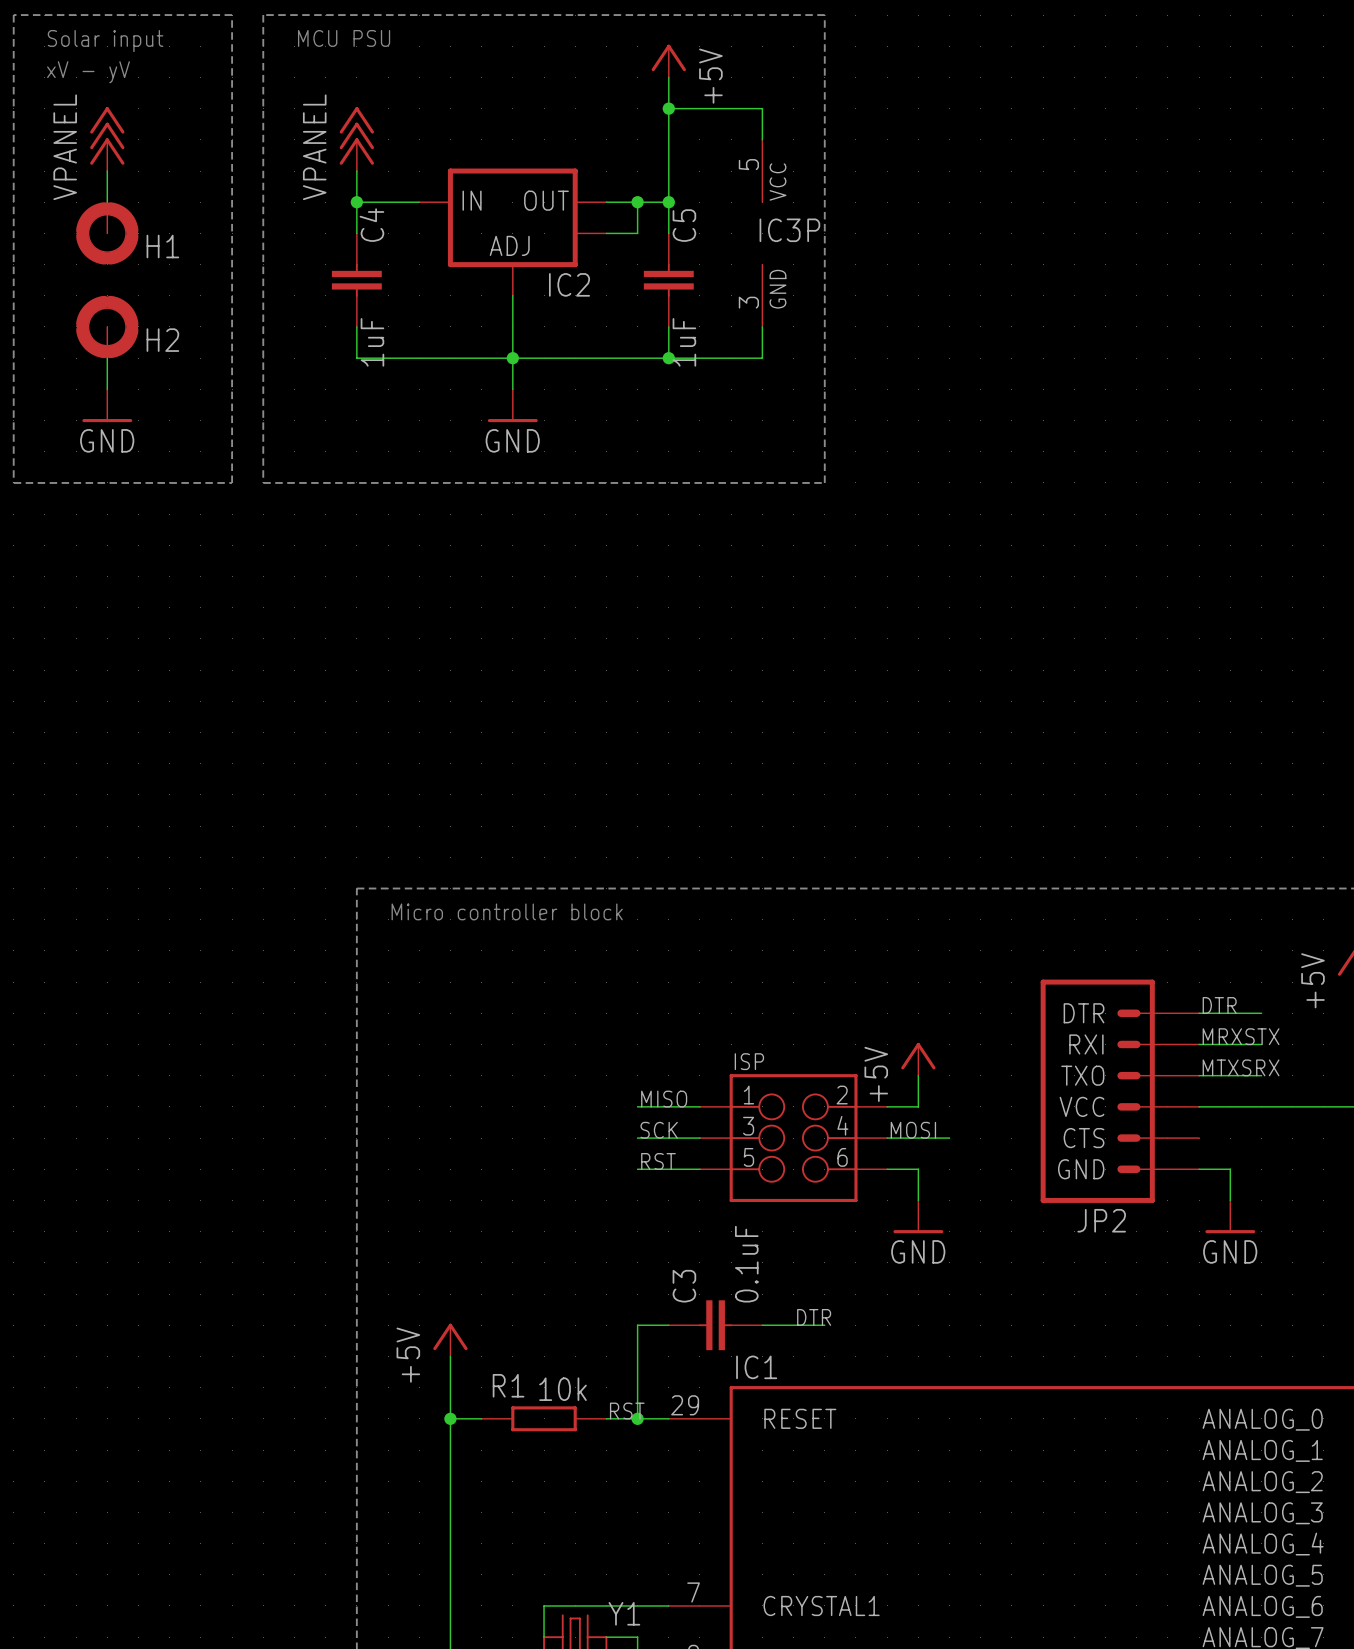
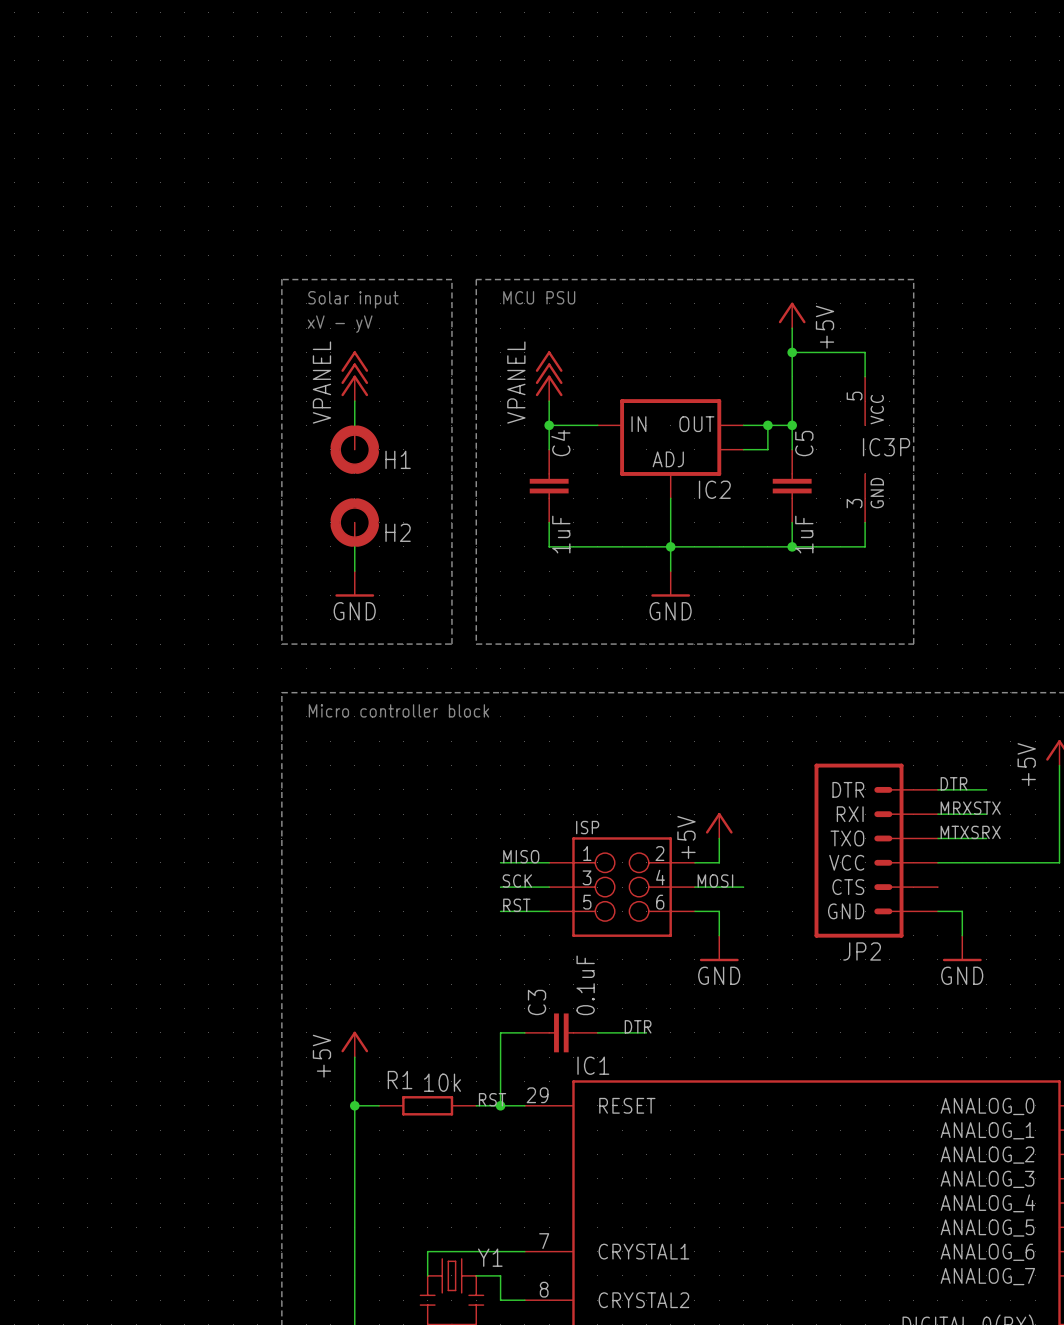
line: (13, 15) (13, 482) (232, 482) (232, 15) (13, 15) -> none
line: (263, 15) (824, 15) (824, 482) (263, 482) (263, 15) -> none
text: MCU PSU (344, 38) -> none
text: Solar input (105, 41) -> none
power symbol: +5V (668, 61) -> none
text: xV - yV (88, 72) -> none
wire: (668, 77) (668, 233) -> none
wire: (668, 108) (762, 108) (762, 139) -> none
junction: (668, 108) -> none
power symbol: VPANEL (107, 139) -> none
power symbol: VPANEL (356, 139) -> none
wire: (107, 171) (107, 202) -> none
wire: (356, 171) (356, 233) -> none
wire: (356, 202) (419, 202) -> none
junction: (356, 202) -> none
wire: (606, 202) (668, 202) -> none
wire: (637, 202) (637, 233) (606, 233) -> none
junction: (637, 202) -> none
junction: (668, 202) -> none
IC2 position: (512, 232) -> (670, 448)
H1 position: (107, 233) -> (354, 449)
IC3P position: (762, 233) -> (865, 449)
C4 position: (356, 280) -> (549, 486)
C5 position: (668, 280) -> (792, 486)
wire: (512, 295) (512, 389) -> none
H2 position: (107, 326) -> (354, 522)
wire: (356, 326) (356, 358) (762, 358) (762, 326) -> none
wire: (668, 326) (668, 358) -> (354, 401) (354, 425)
wire: (107, 358) (107, 389) -> none
line: none -> (281, 279) (281, 644) (451, 644) (451, 279) (281, 279)
junction: (512, 358) -> none
line: none -> (476, 279) (913, 279) (913, 644) (476, 644) (476, 279)
junction: (668, 358) -> none
text: none -> MCU PSU (539, 297)
text: none -> Solar input (353, 299)
power symbol: none -> +5V (792, 315)
power symbol: GND (107, 405) -> none
power symbol: GND (512, 405) -> none
text: none -> xV - yV (340, 324)
wire: none -> (792, 328) (792, 449)
wire: none -> (792, 352) (865, 352) (865, 376)
junction: none -> (792, 352)
power symbol: none -> VPANEL (354, 376)
power symbol: none -> VPANEL (549, 376)
wire: none -> (549, 401) (549, 449)
wire: none -> (549, 425) (597, 425)
junction: none -> (549, 425)
wire: none -> (743, 425) (792, 425)
wire: none -> (767, 425) (767, 449) (743, 449)
junction: none -> (767, 425)
junction: none -> (792, 425)
wire: none -> (670, 498) (670, 571)
wire: none -> (549, 522) (549, 546) (865, 546) (865, 522)
wire: none -> (792, 522) (792, 546)
wire: none -> (354, 546) (354, 571)
junction: none -> (670, 546)
junction: none -> (792, 546)
power symbol: none -> GND (354, 583)
power symbol: none -> GND (670, 583)

